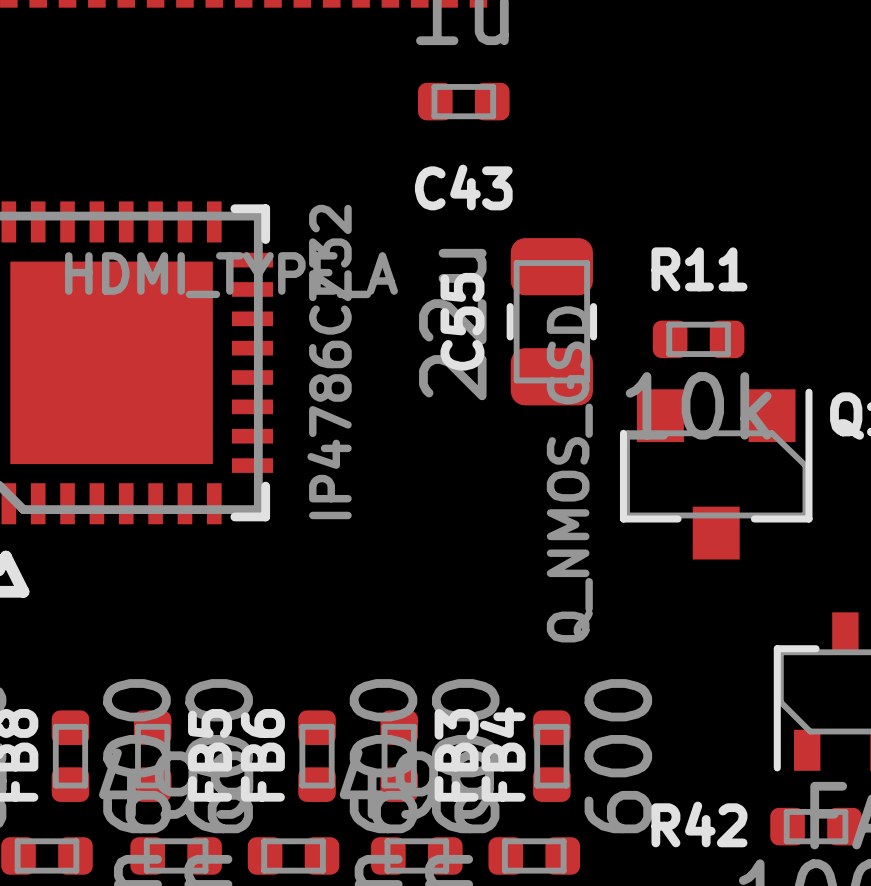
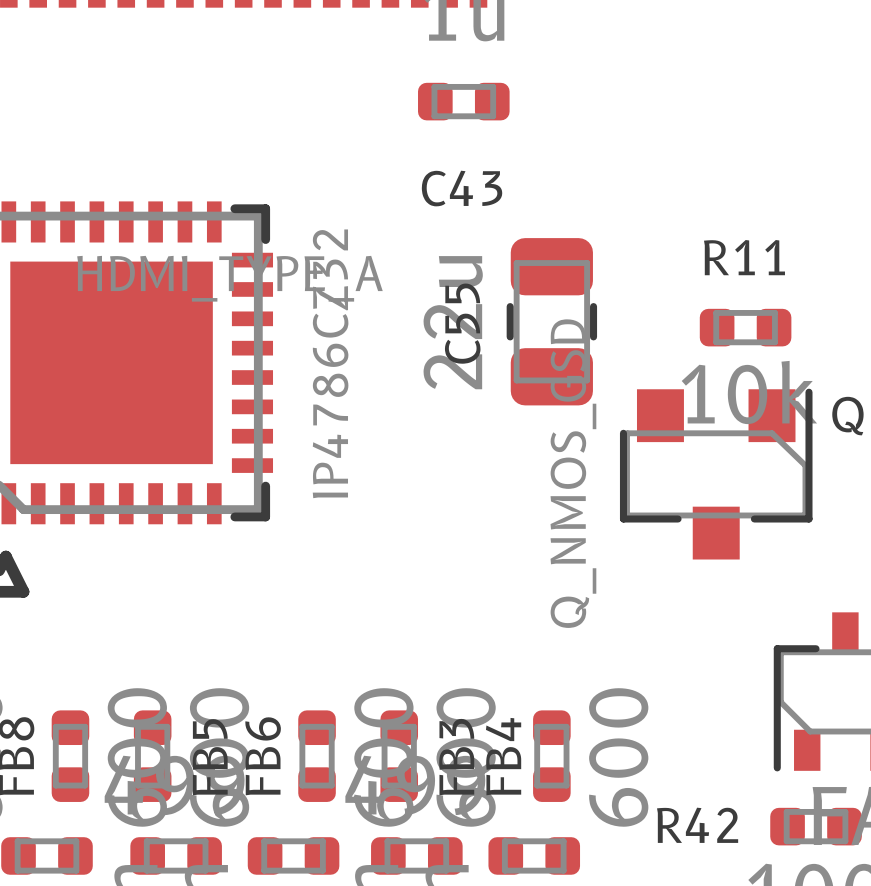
R11 position: (698, 339) -> (745, 327)

